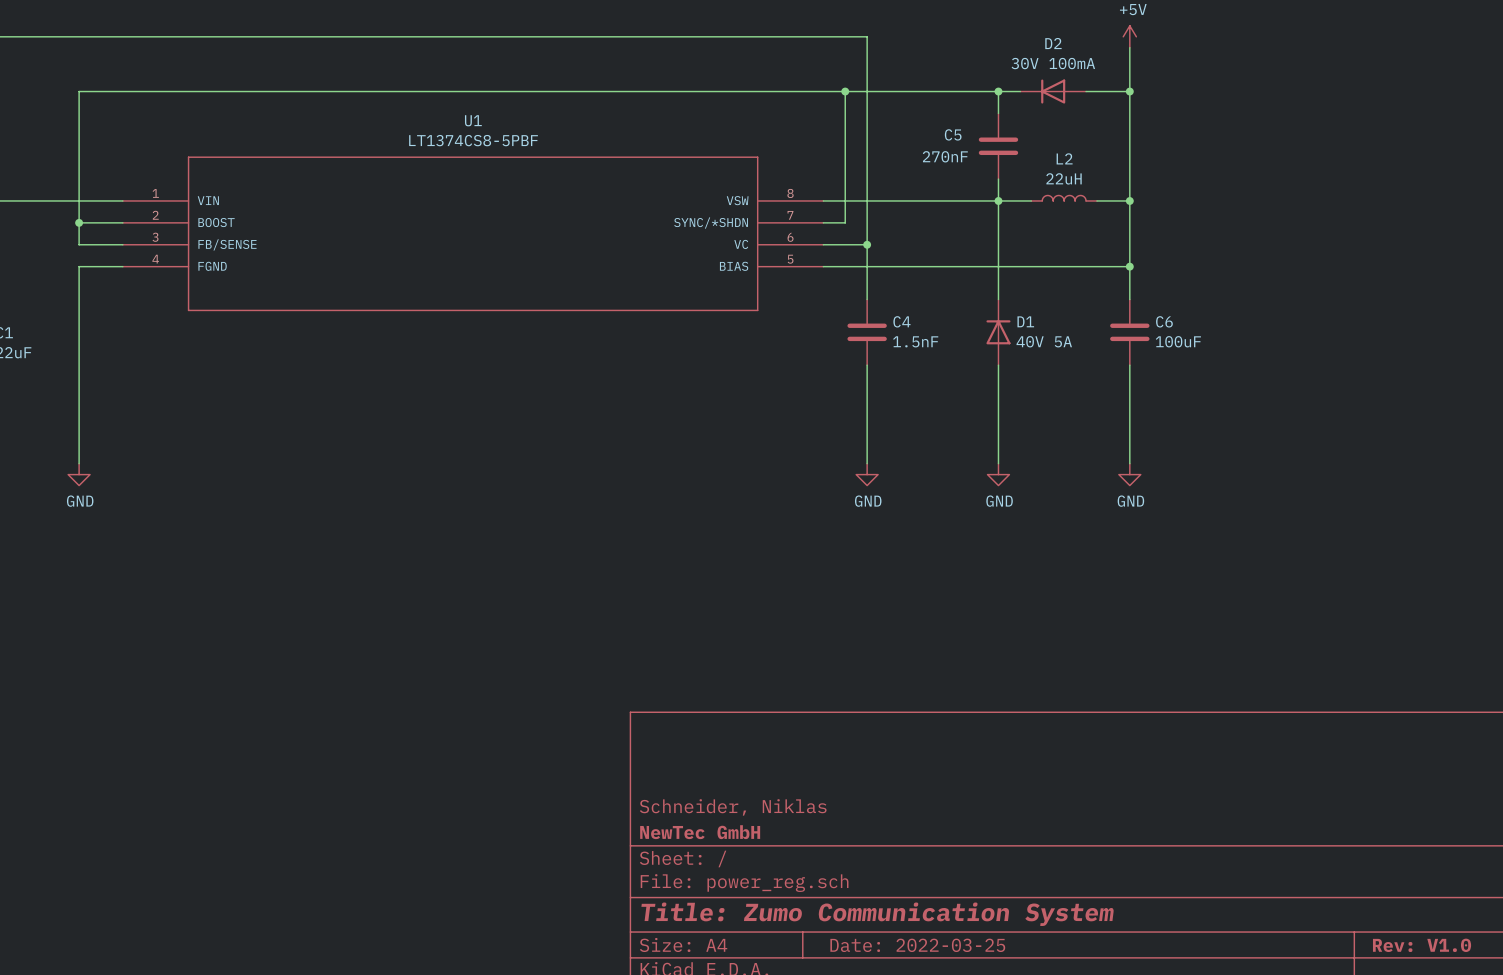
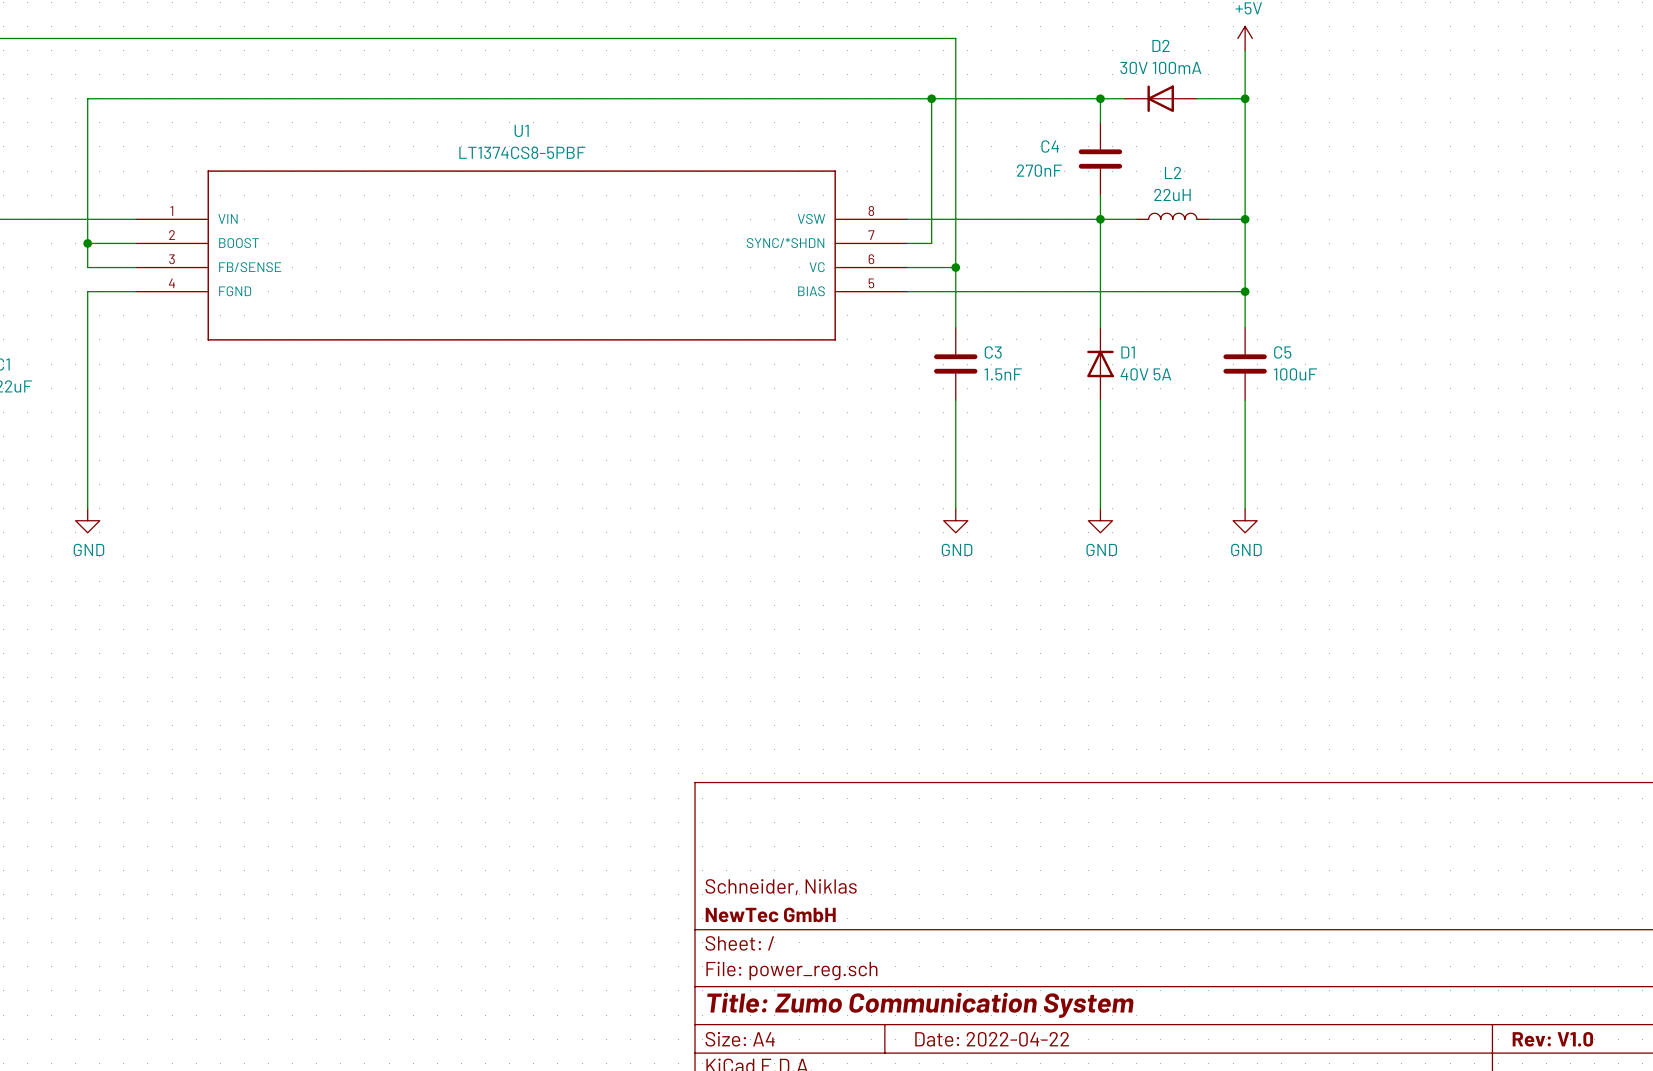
C5 name: C5 (953, 134) -> C4 (1050, 146)
C4 name: C4 (901, 321) -> C3 (993, 352)
C6 name: C6 (1164, 321) -> C5 (1282, 352)
title block: Date: 2022-03-25 (917, 945) -> Date: 2022-04-22 (992, 1039)

